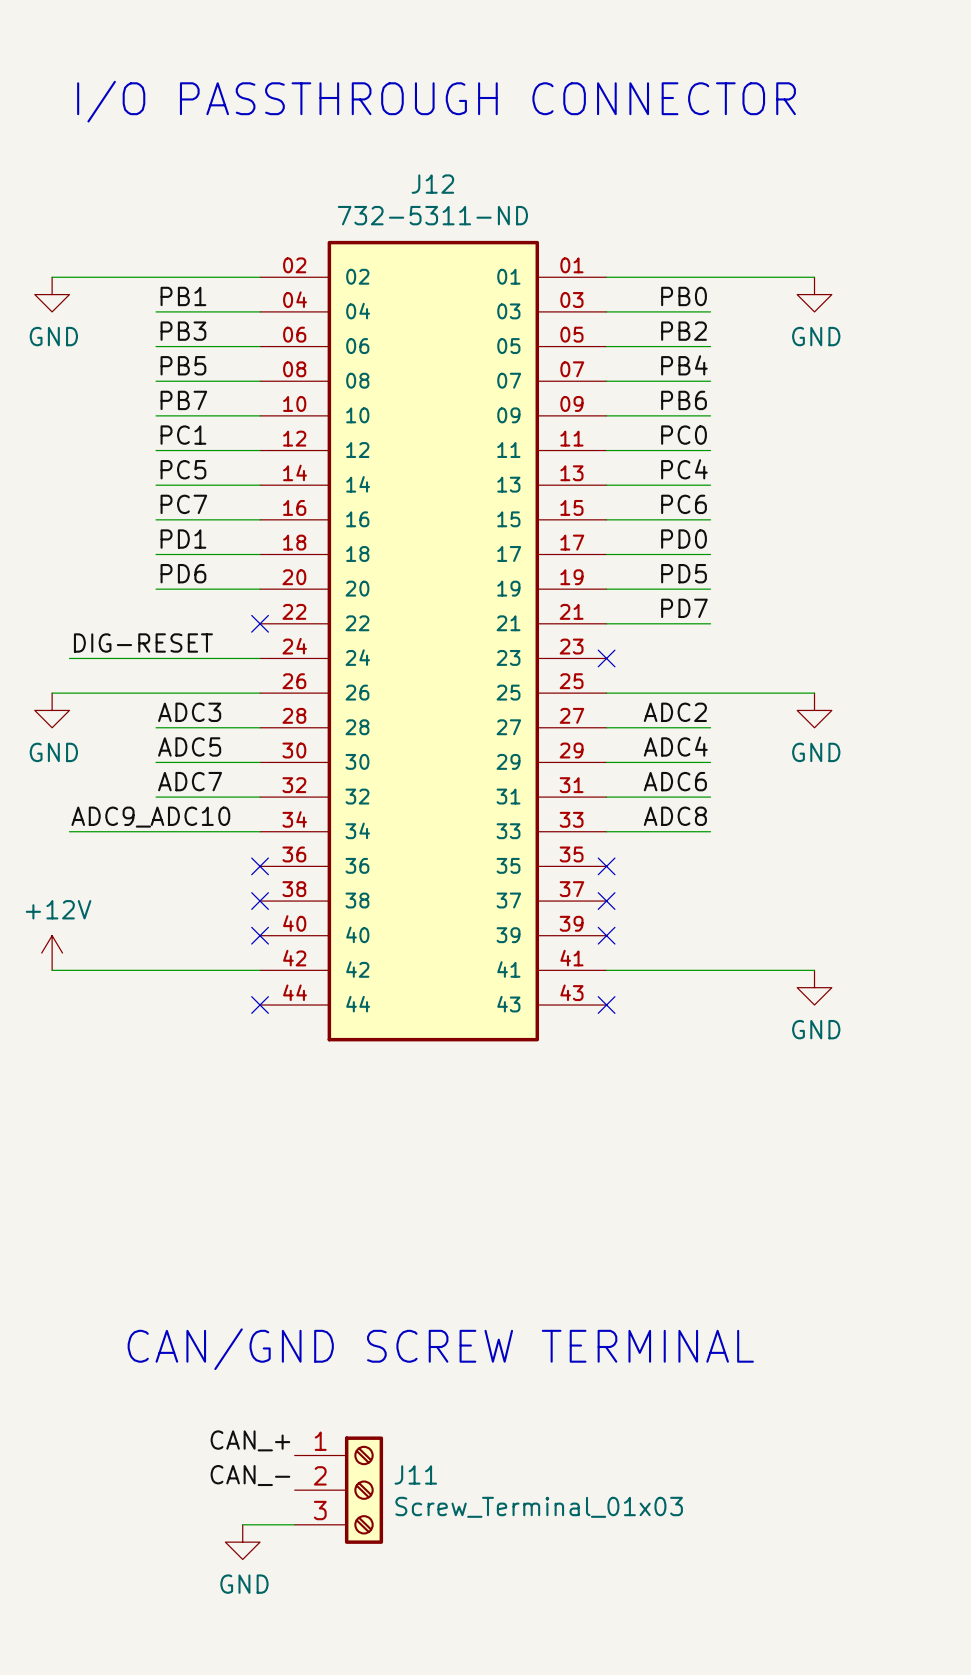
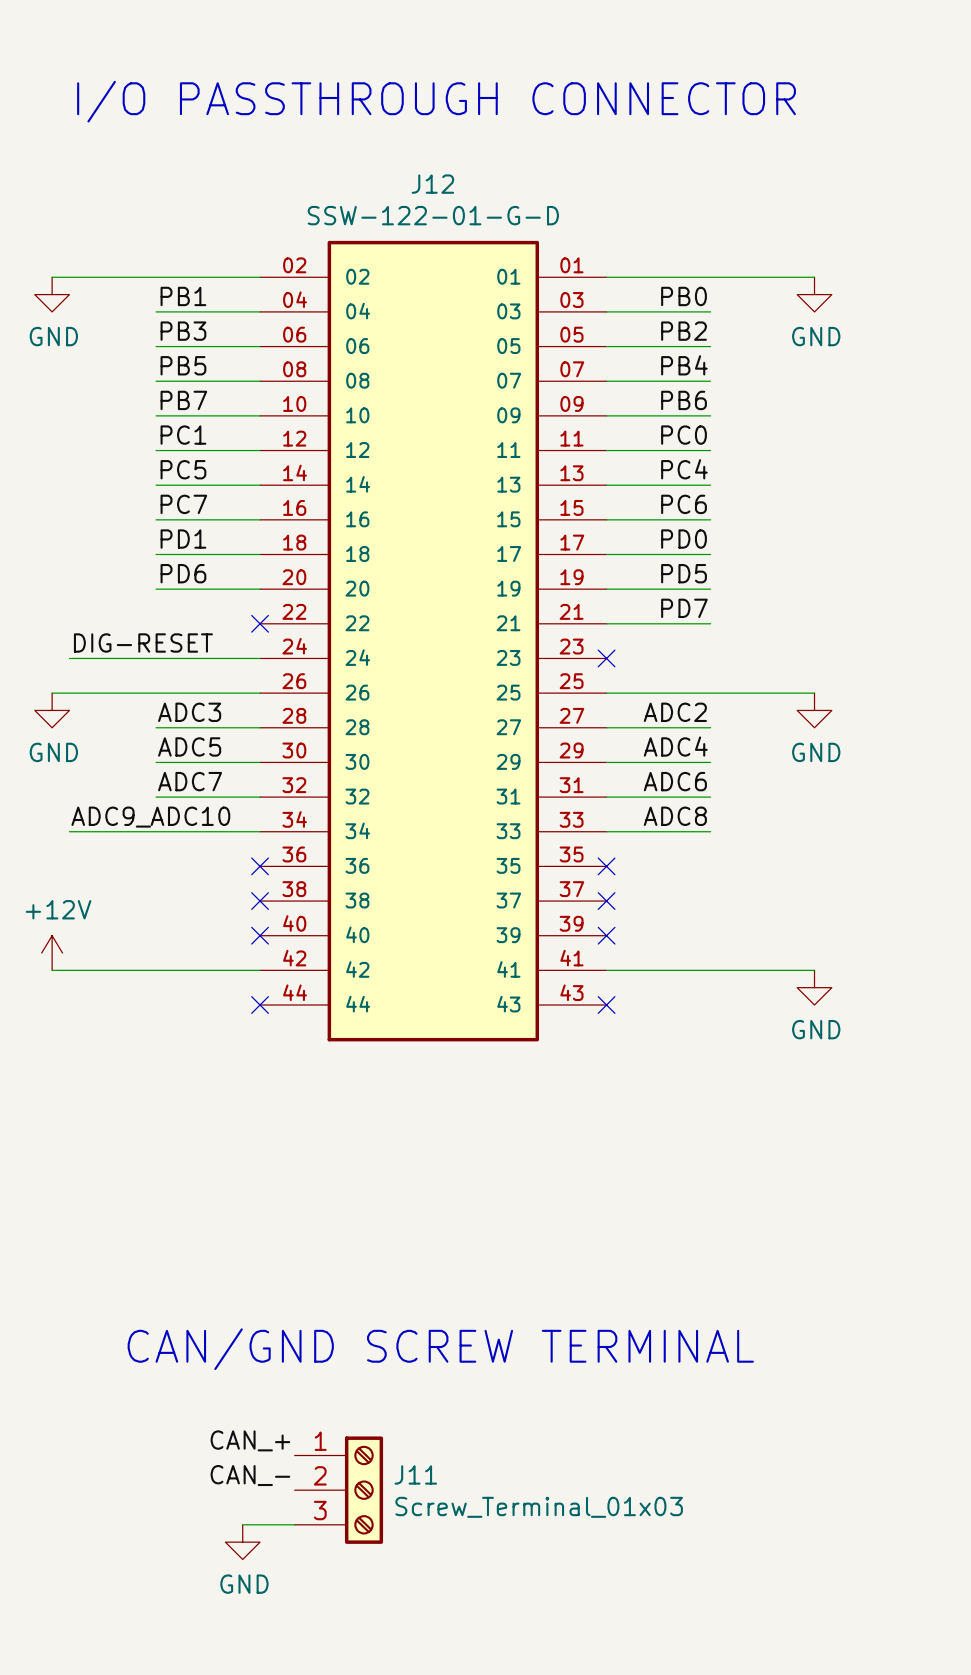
J12 value: 732-5311-ND (432, 215) -> SSW-122-01-G-D (433, 215)

